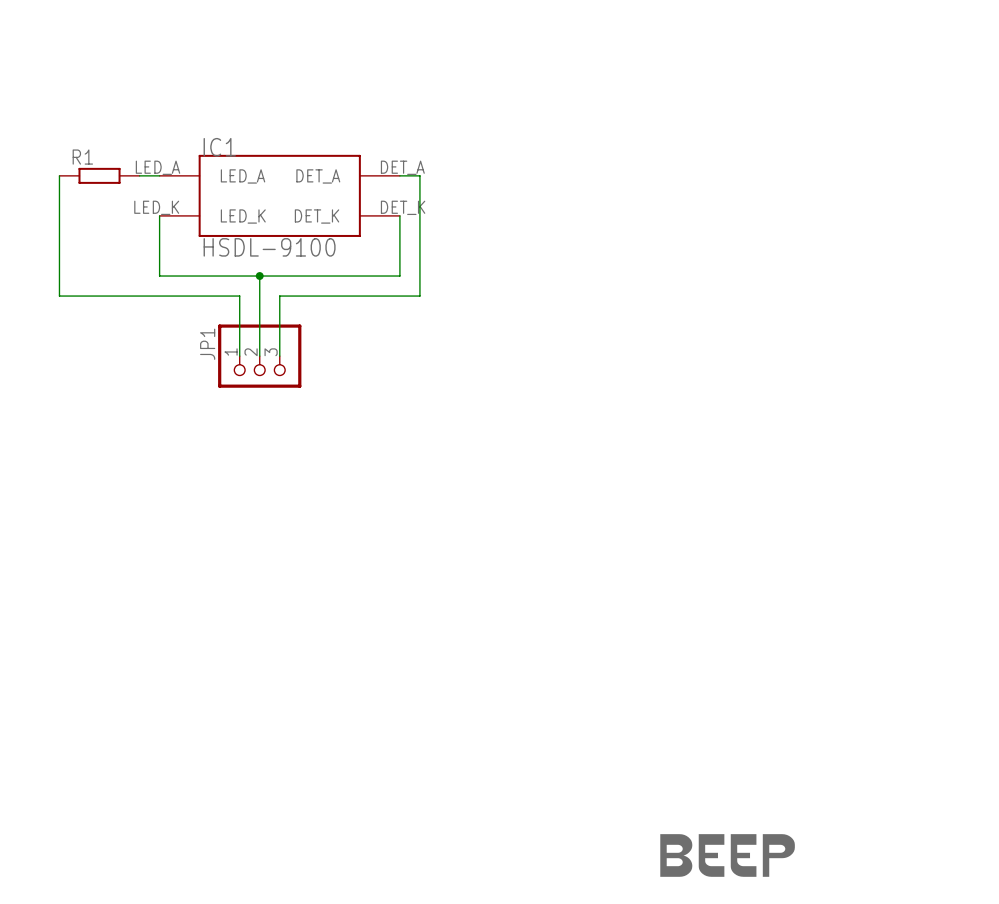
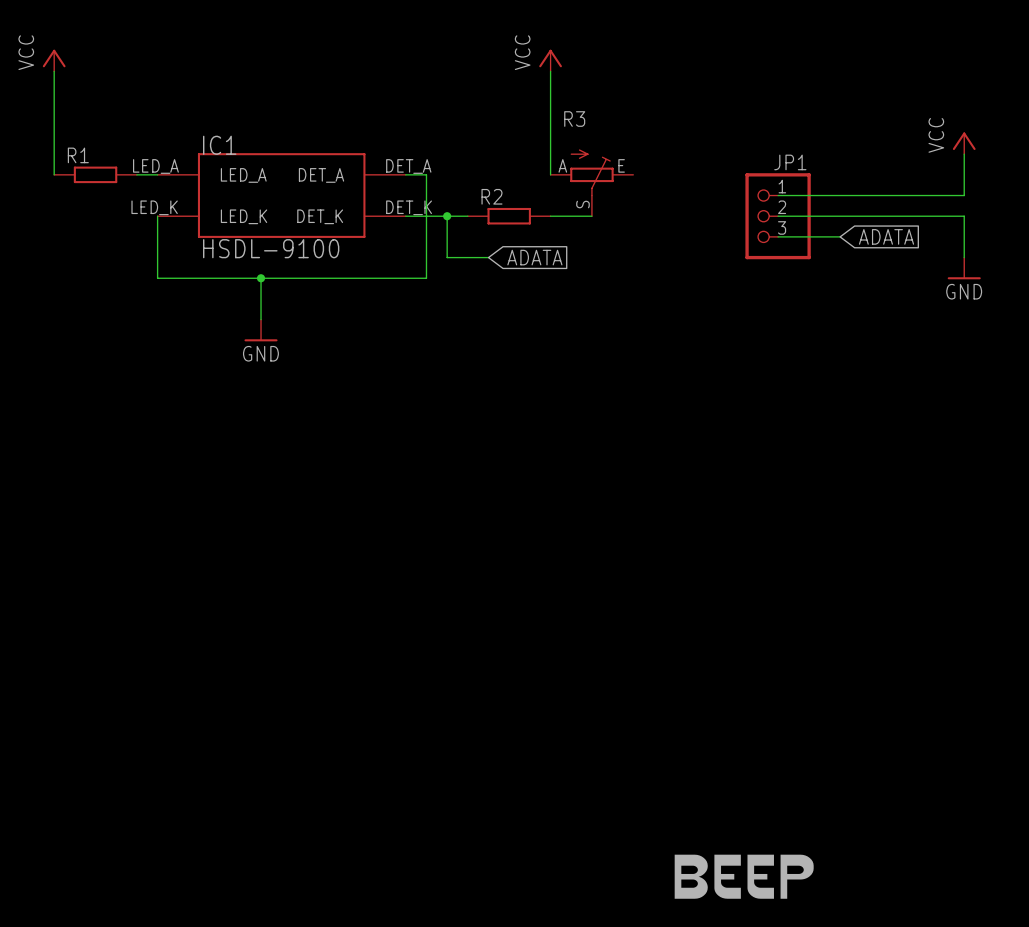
power symbol: none -> VCC (54, 60)
power symbol: none -> VCC (550, 60)
wire: none -> (550, 71) (550, 174)
power symbol: none -> VCC (964, 143)
wire: none -> (964, 154) (964, 195) (778, 195)
wire: (59, 175) (59, 296) (239, 296) (239, 356) -> (54, 174) (54, 71)
R3: none -> (591, 182)
wire: (399, 215) (399, 276) -> (426, 278) (405, 278)
wire: none -> (405, 216) (467, 216)
wire: none -> (447, 216) (447, 257) (488, 257)
junction: none -> (447, 216)
R2: none -> (509, 216)
wire: none -> (550, 216) (591, 216)
wire: none -> (778, 216) (964, 216) (964, 257)
wire: none -> (778, 236) (840, 236)
global label: none -> ADATA (886, 236)
global label: none -> ADATA (534, 257)
power symbol: none -> GND (964, 268)
wire: (419, 276) (419, 296) (279, 296) (279, 356) -> none
power symbol: none -> GND (261, 330)
JP1 rotation: 0° (259, 356) -> 90° clockwise (778, 216)
JP1 position: (259, 356) -> (778, 216)

